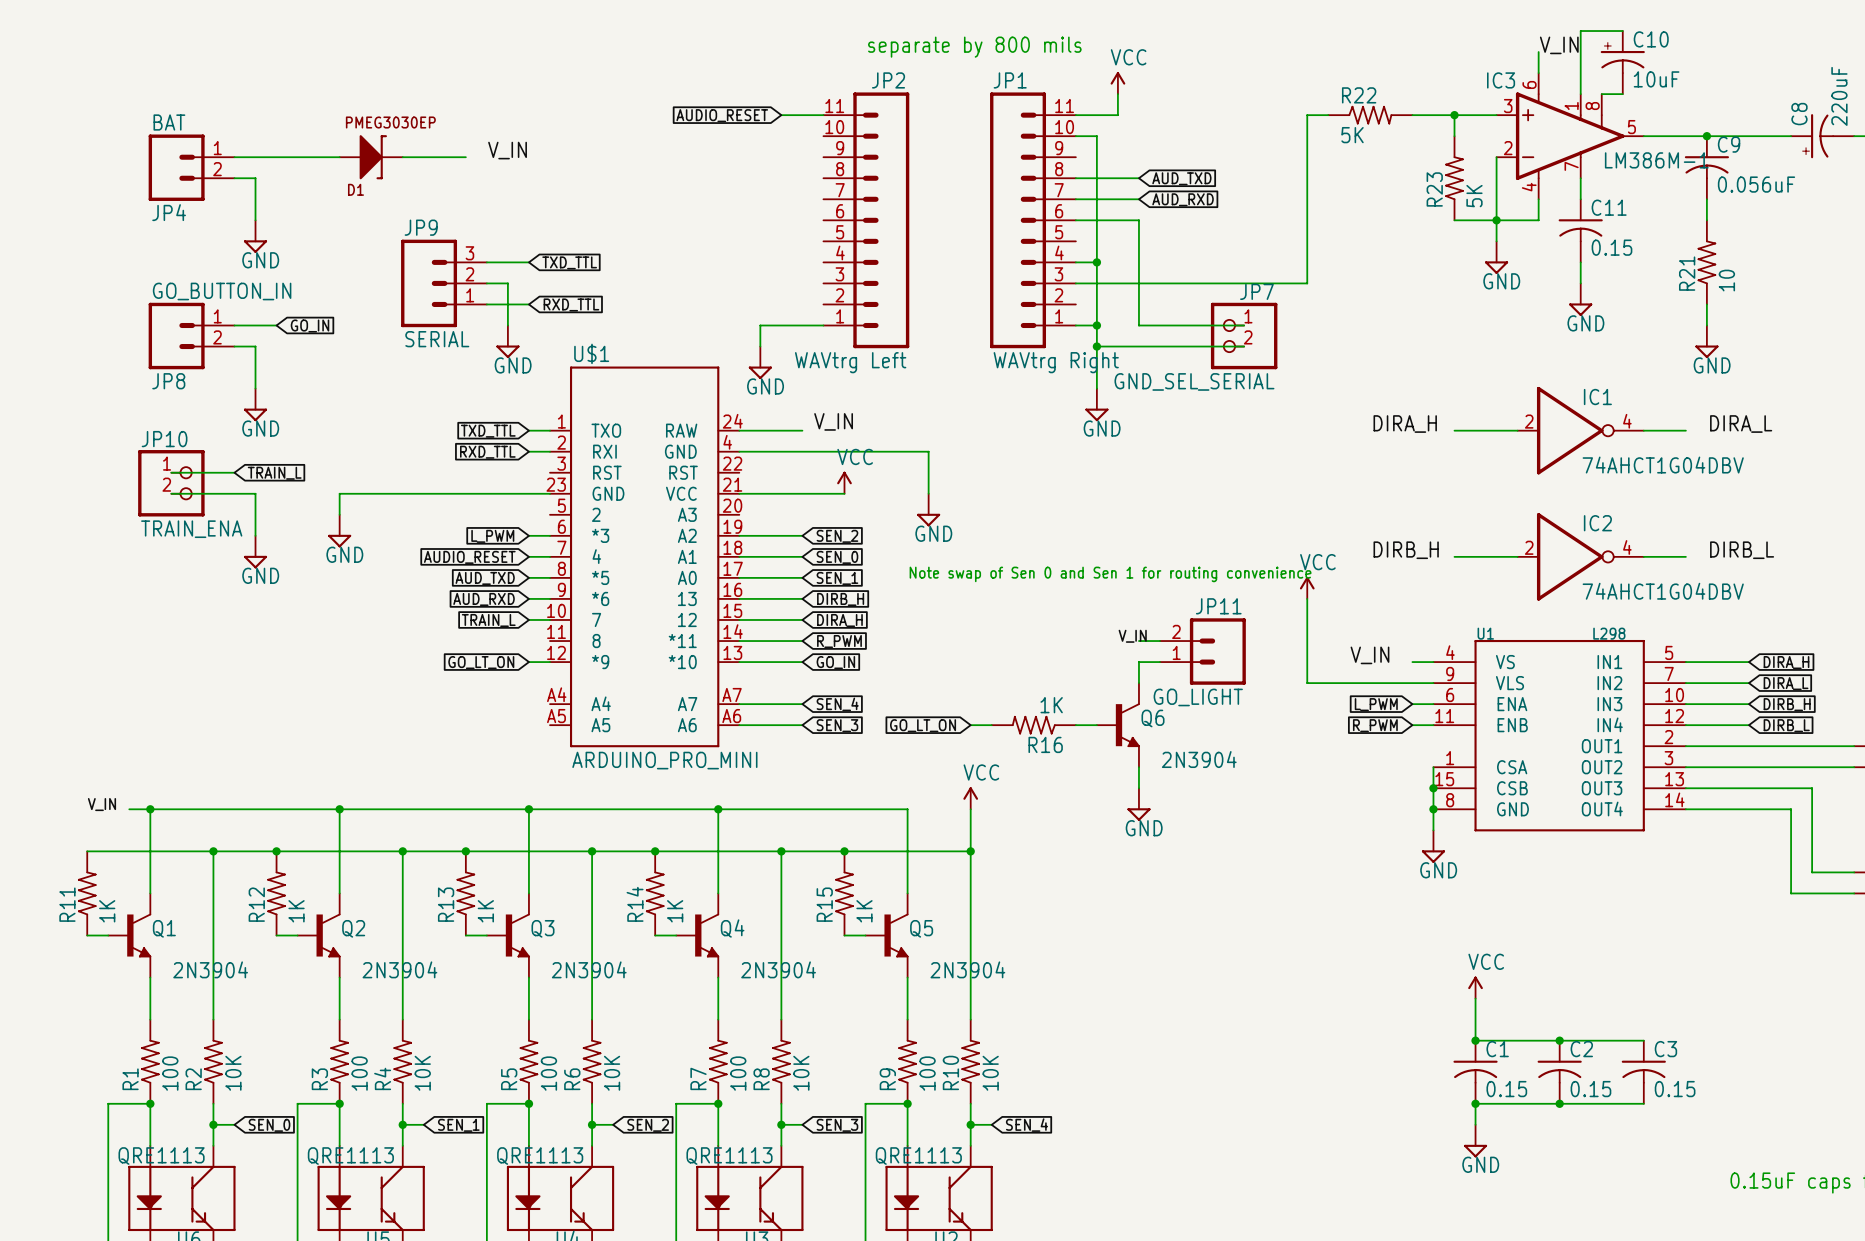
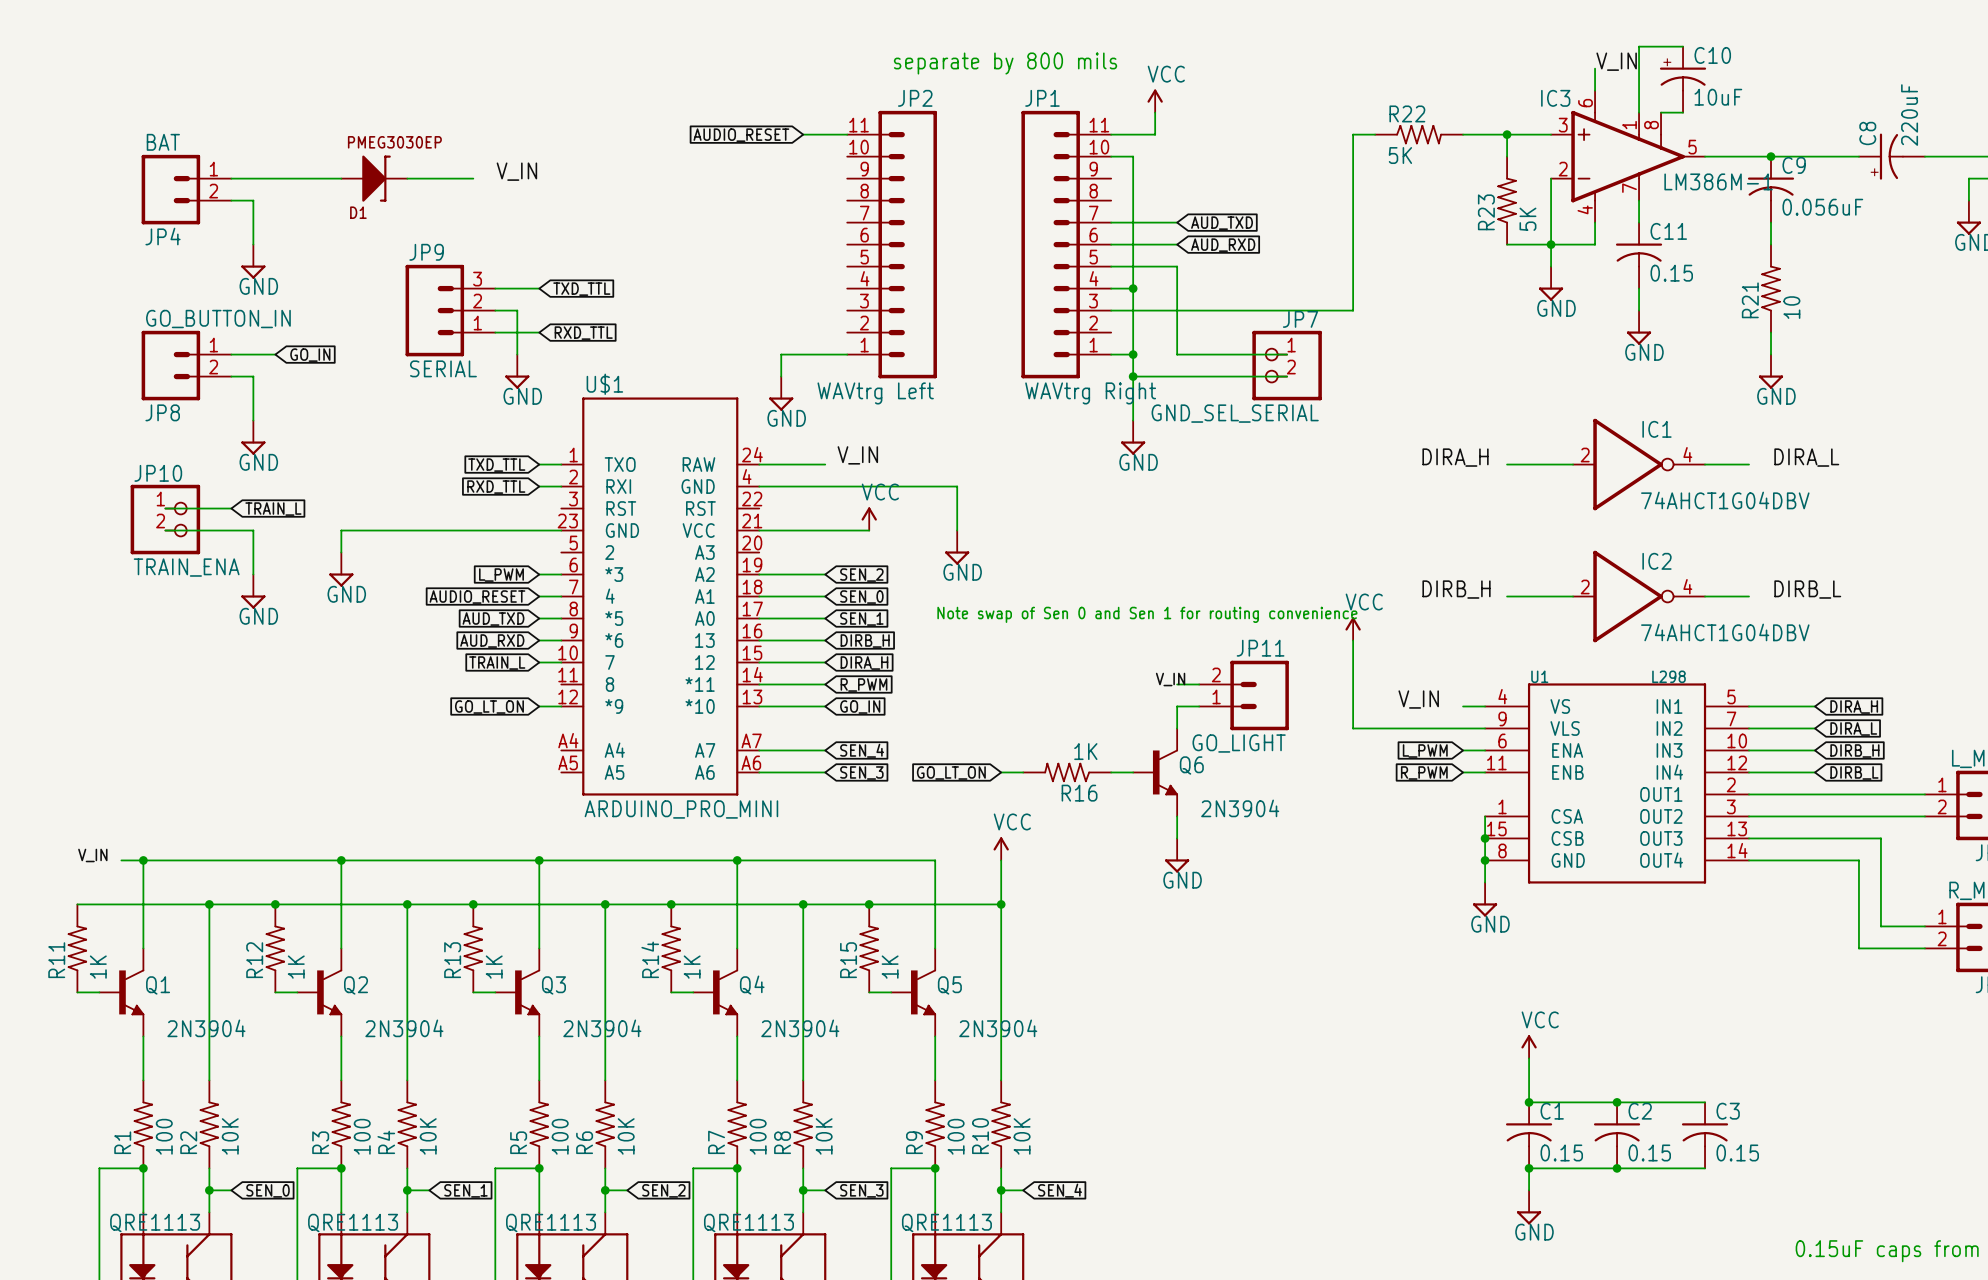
wire: (1075, 178) (1138, 178) -> none
global label: AUD_TXD (1181, 178) -> none
global label: AUD_RXD (1183, 199) -> AUD_TXD (1222, 223)
wire: (1138, 220) (1138, 241) -> (1111, 266) (1177, 266)
global label: none -> AUD_RXD (1223, 245)

